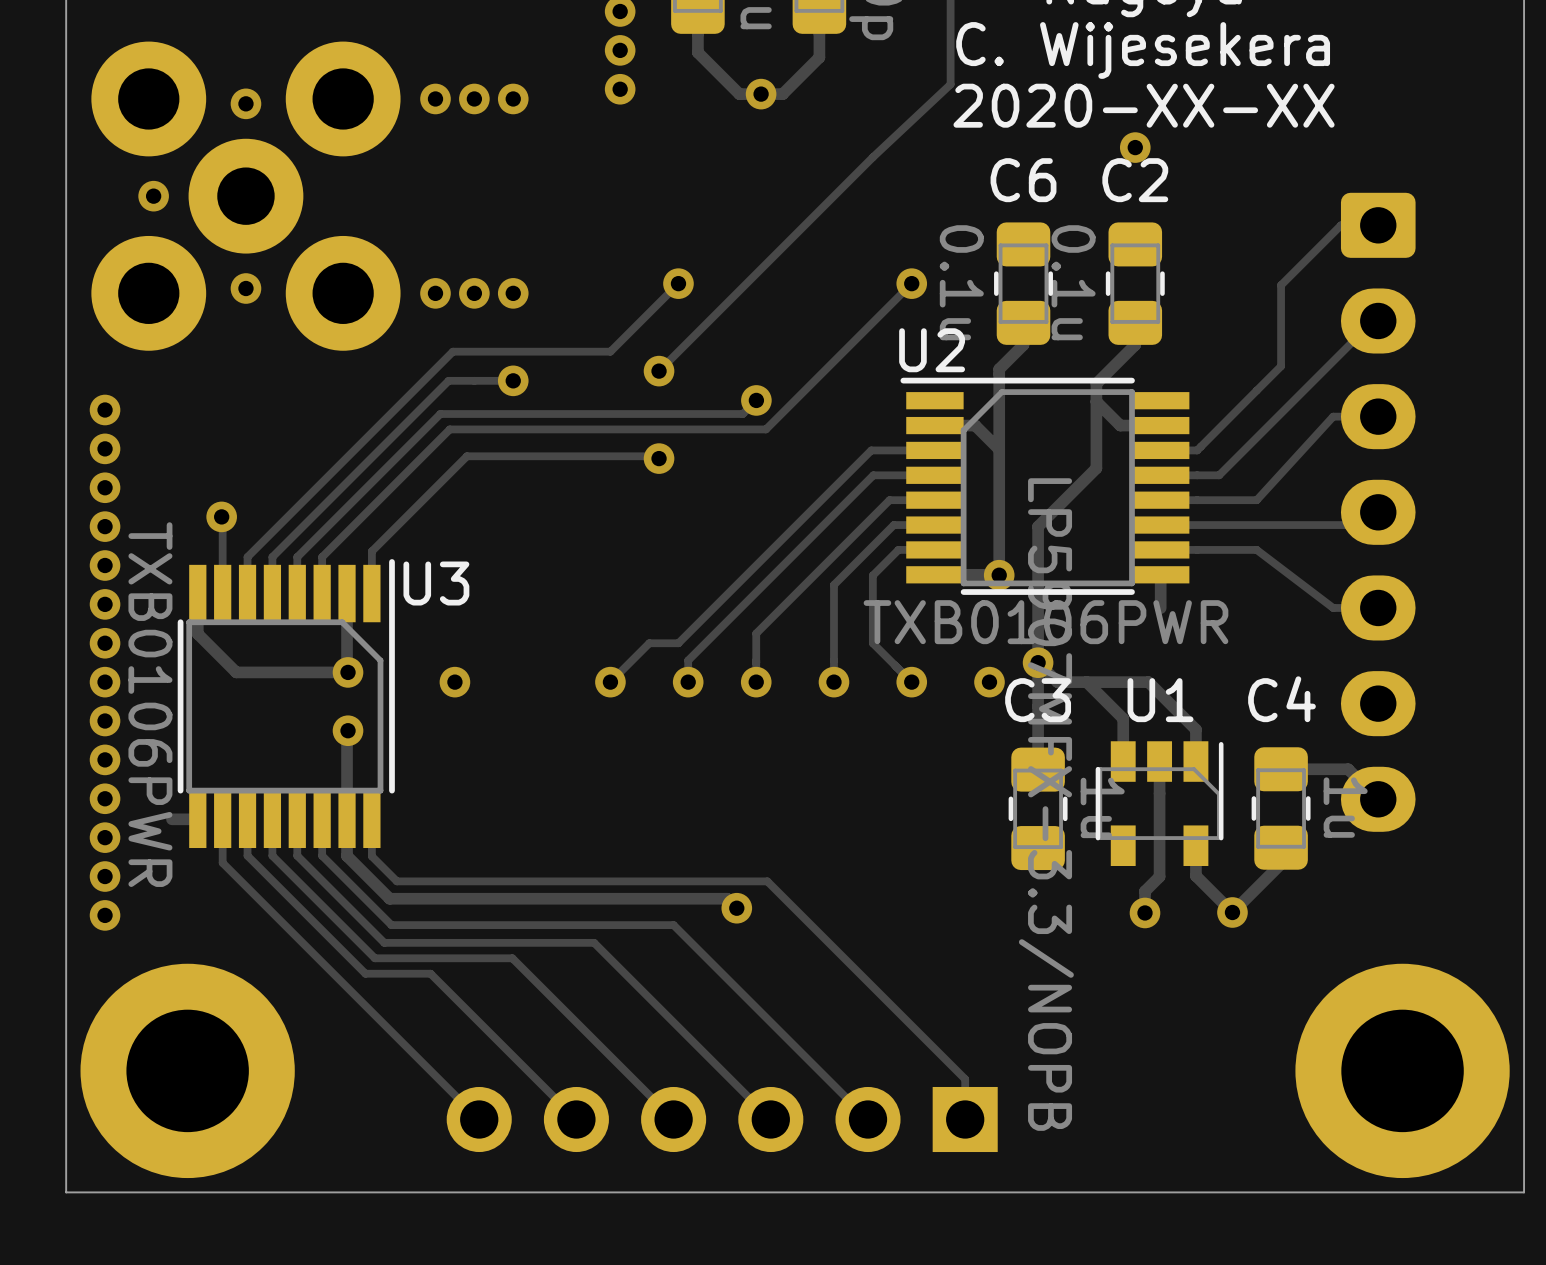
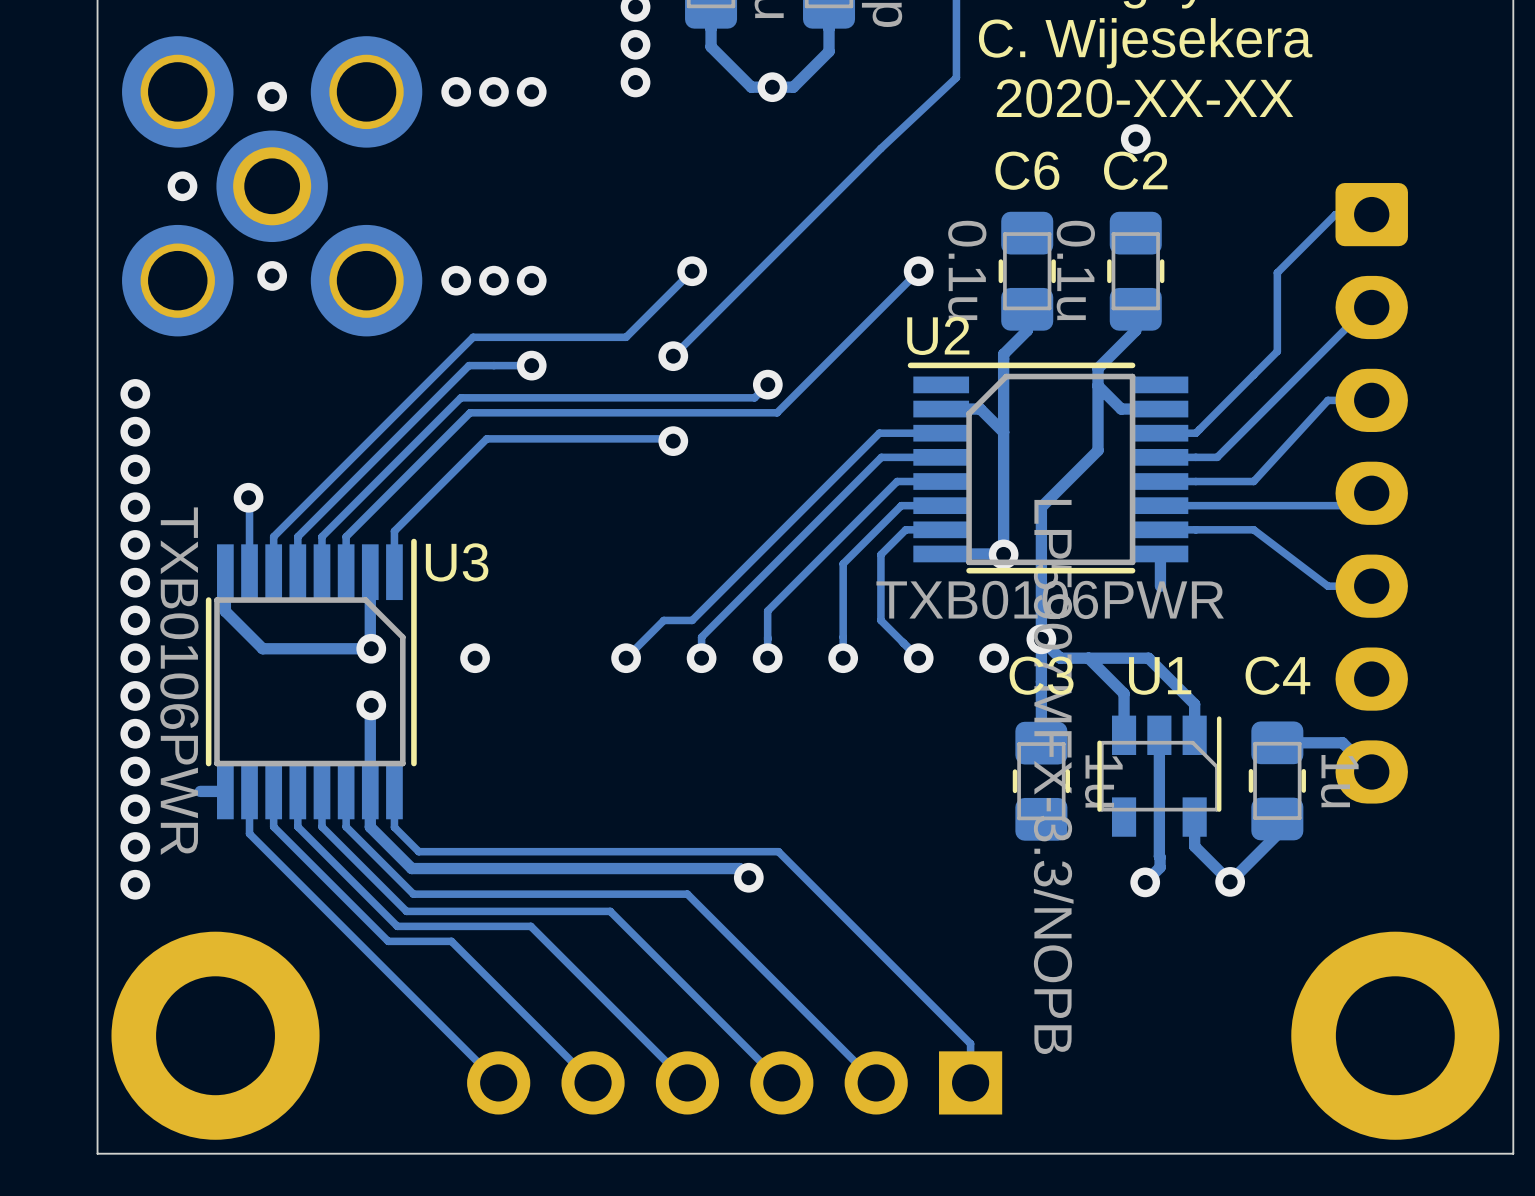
track: (1159, 876) (1145, 891) (1145, 912) -> (1159, 847) (1160, 867) (1145, 882)

